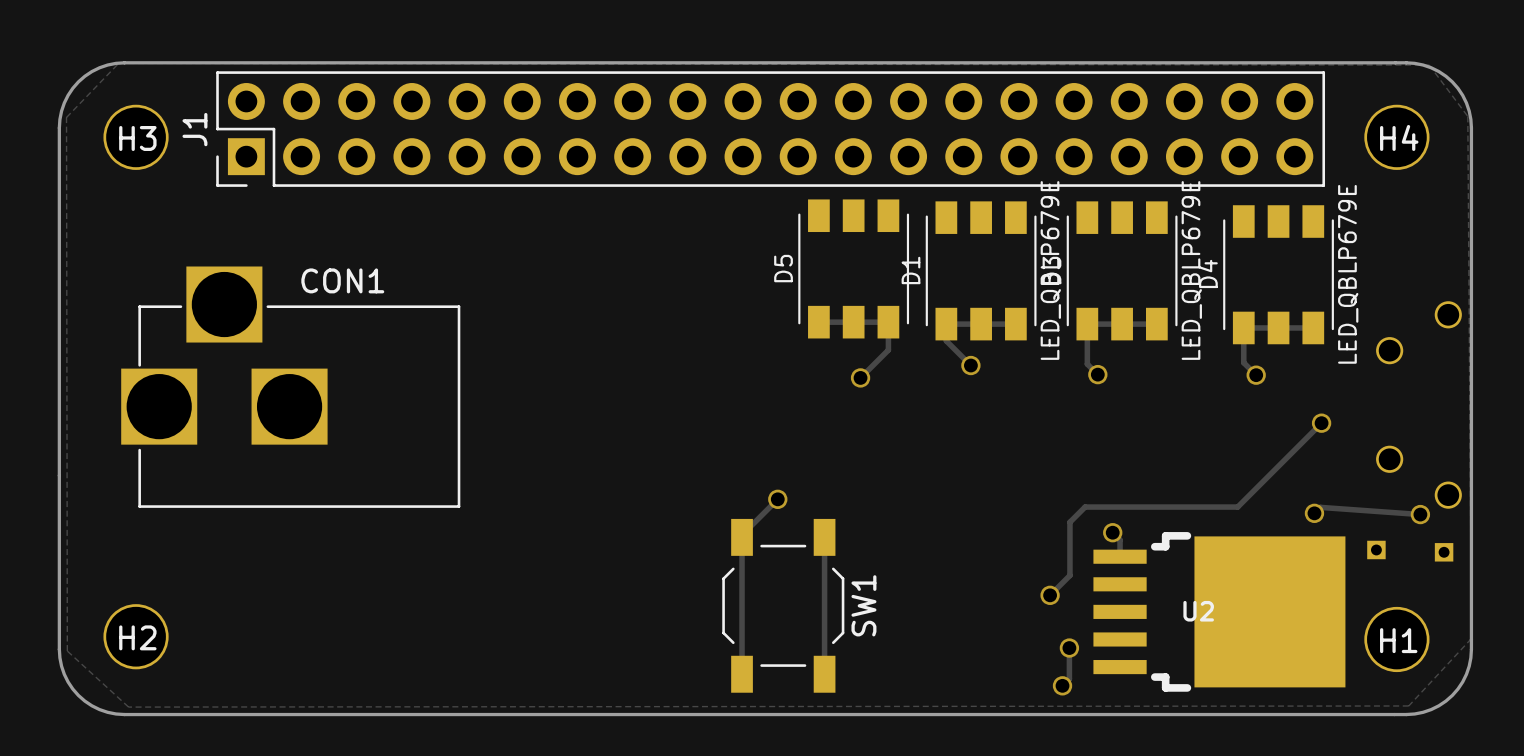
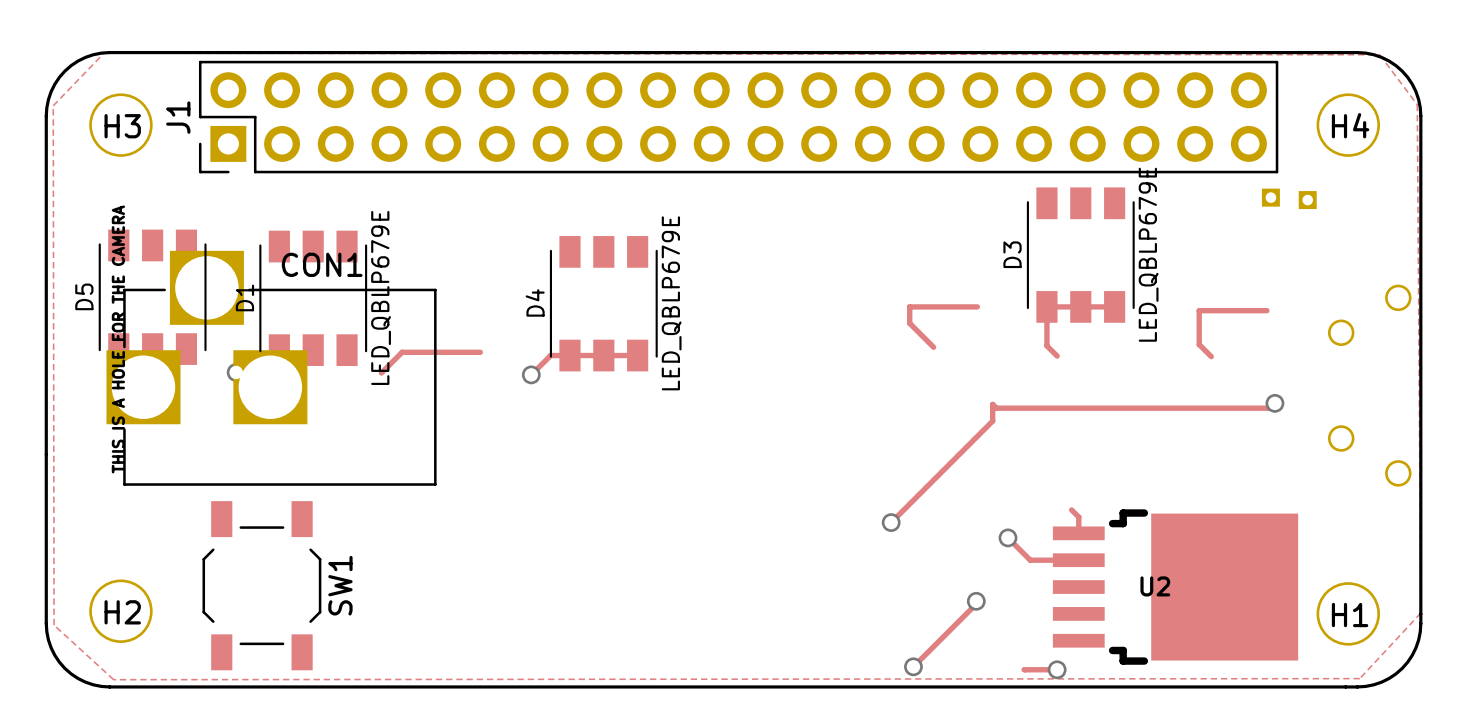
part: none -> (1270, 197)
part: none -> (1307, 200)
D5 position: (853, 268) -> (152, 297)
D1 position: (981, 270) -> (313, 298)
D4 position: (1278, 274) -> (603, 303)
track: (818, 322) (888, 322) (888, 350) (860, 377) -> none
text: none -> THIS IS A HOLE FOR THE CAMERA (118, 339)
via: (970, 365) -> none
track: none -> (480, 352) (402, 352) (381, 373)
track: none -> (637, 355) (550, 355) (531, 374)
via: (1097, 374) -> none
via: (1256, 375) -> none
via: (860, 377) -> none
via: none -> (236, 372)
via: none -> (531, 374)
track: (1316, 428) (1237, 507) (1085, 507) (1069, 522) (1069, 575) (1050, 595) -> (1270, 408) (996, 408) (992, 404) (992, 421) (891, 522)
track: (777, 499) (742, 535) (742, 674) -> none
via: (777, 499) -> none
track: (1314, 513) (1320, 507) (1420, 514) -> none
via: (1314, 513) -> none
via: (1420, 514) -> none
via: (1112, 532) -> none
track: (824, 537) (824, 674) -> none
via: none -> (891, 522)
part: (1376, 549) -> none
part: (1444, 552) -> none
track: none -> (1008, 537) (1030, 560) (1059, 560)
via: none -> (1008, 537)
via: (1050, 595) -> none
SW1 position: (783, 605) -> (261, 585)
track: none -> (976, 601) (976, 603) (913, 666)
via: none -> (976, 601)
track: (1069, 648) (1069, 678) (1062, 685) -> none
via: (1069, 648) -> none
via: (1062, 685) -> none
via: none -> (913, 666)
track: none -> (1024, 669) (1057, 669)
via: none -> (1057, 669)

